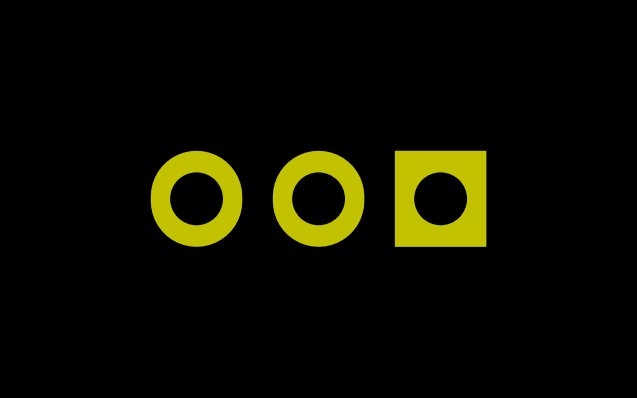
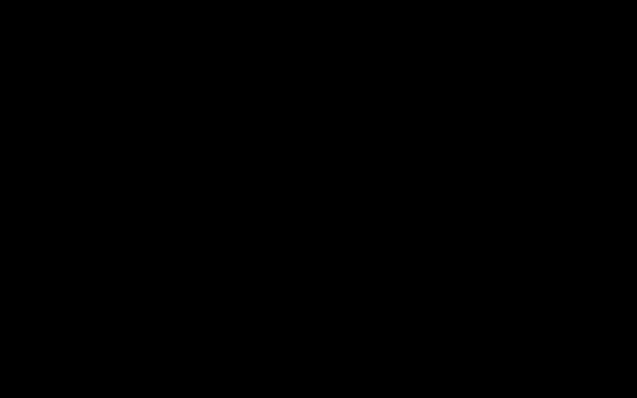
part: (318, 198) -> none

